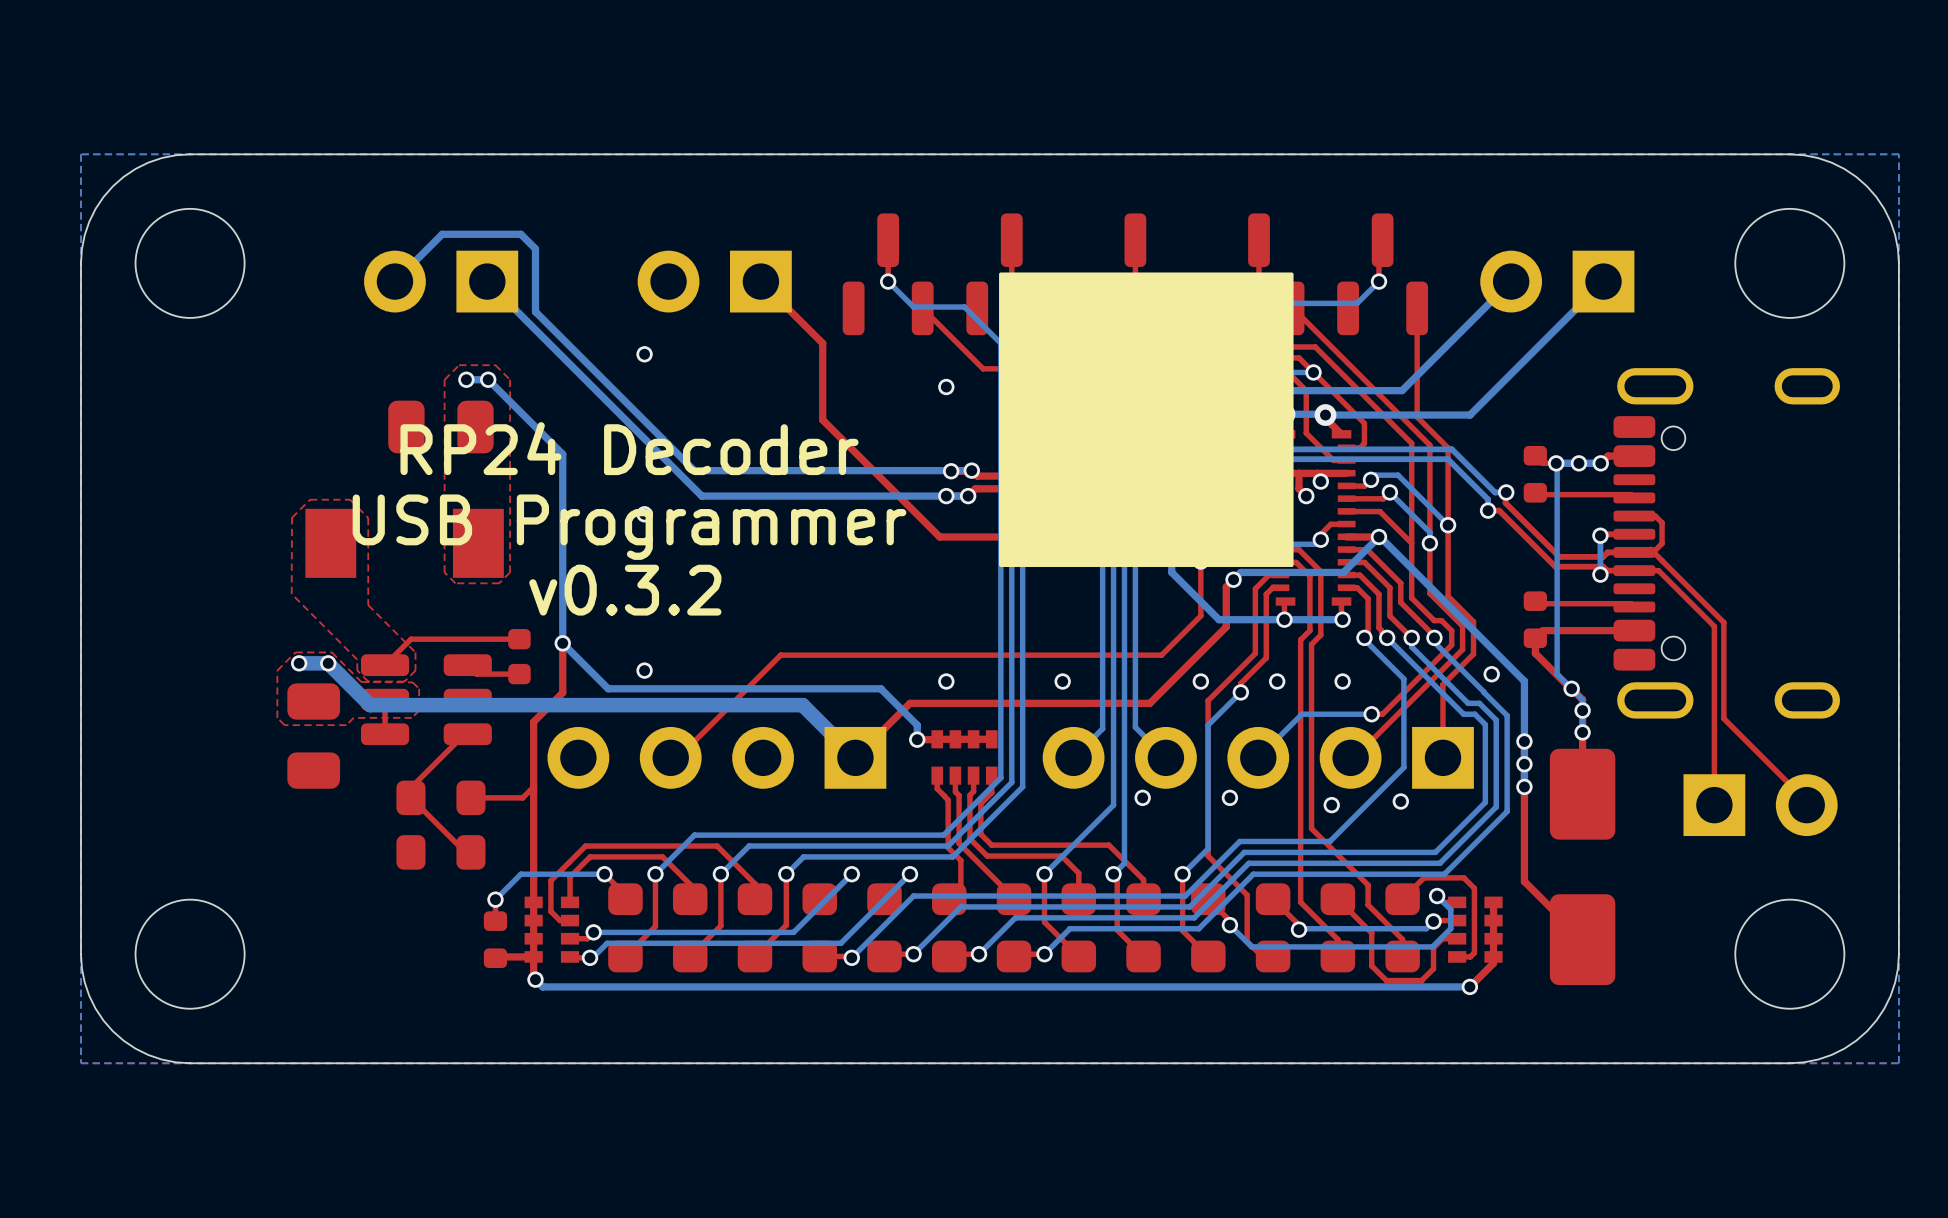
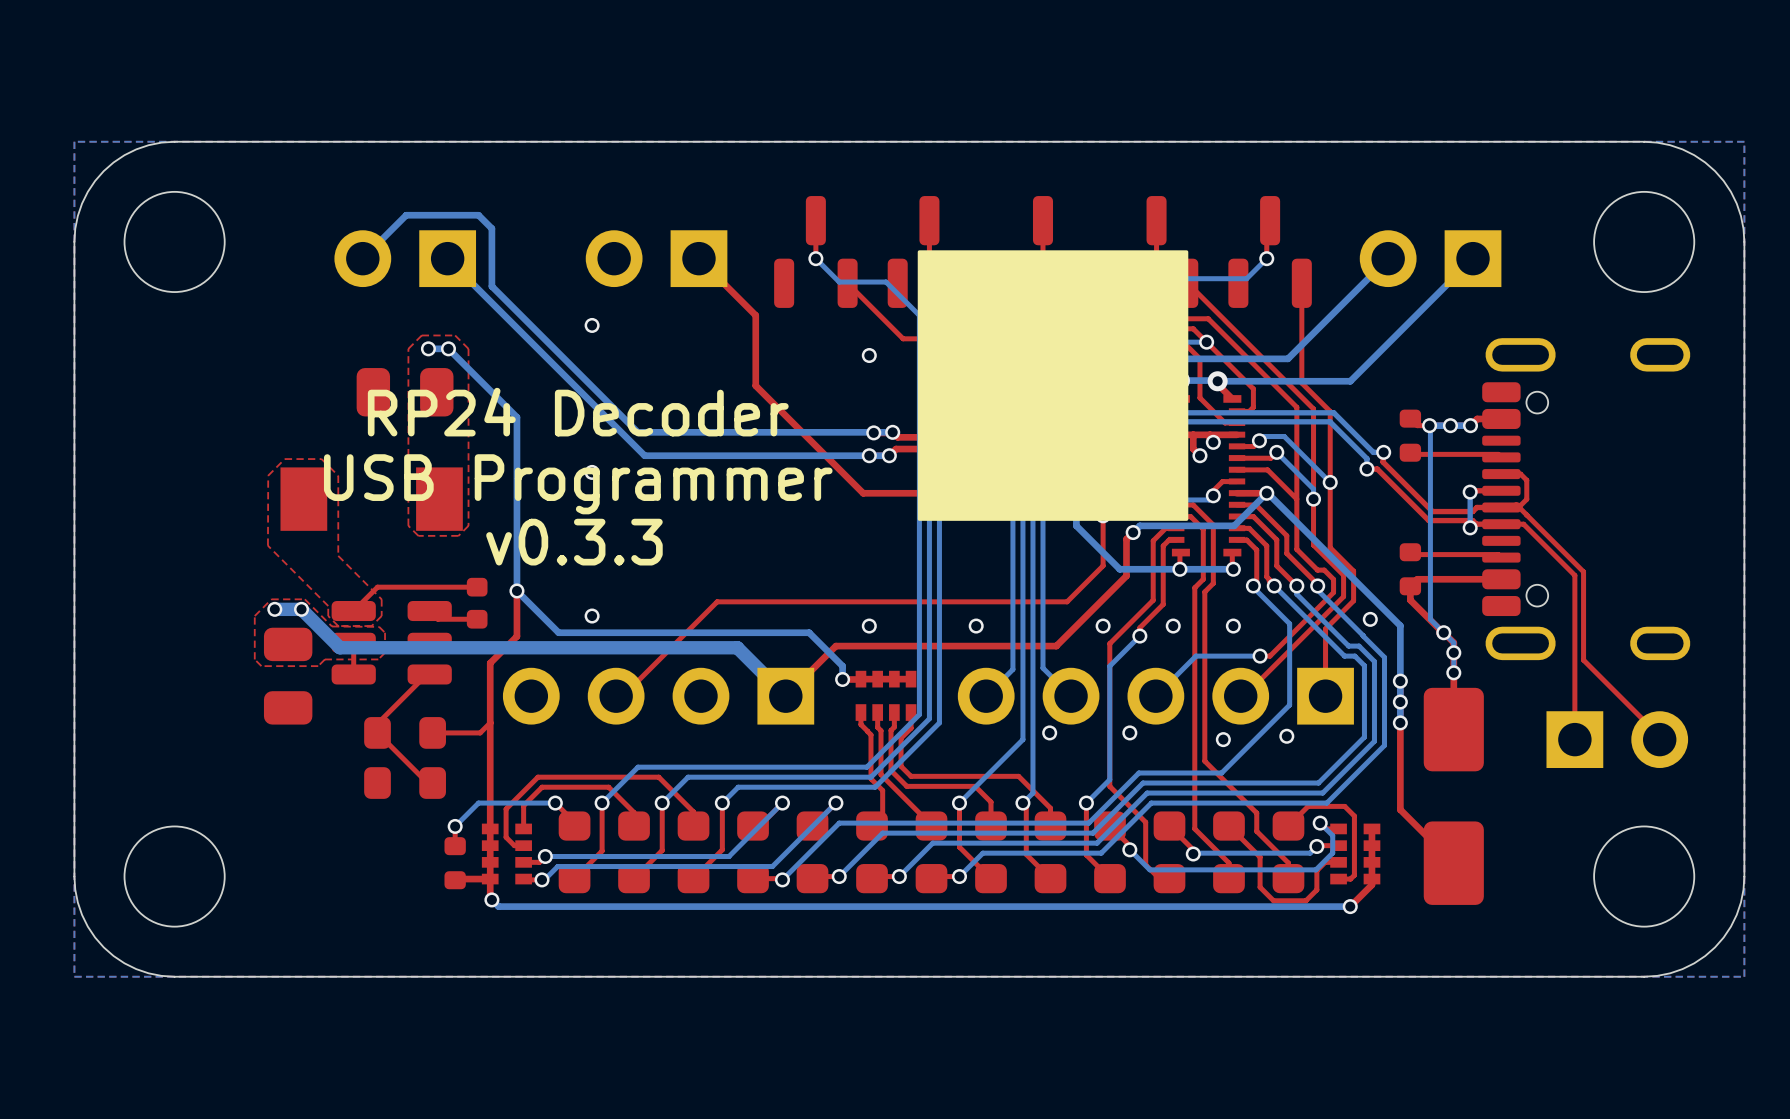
text: v0.3.2 (625, 590) -> v0.3.3 (574, 542)

